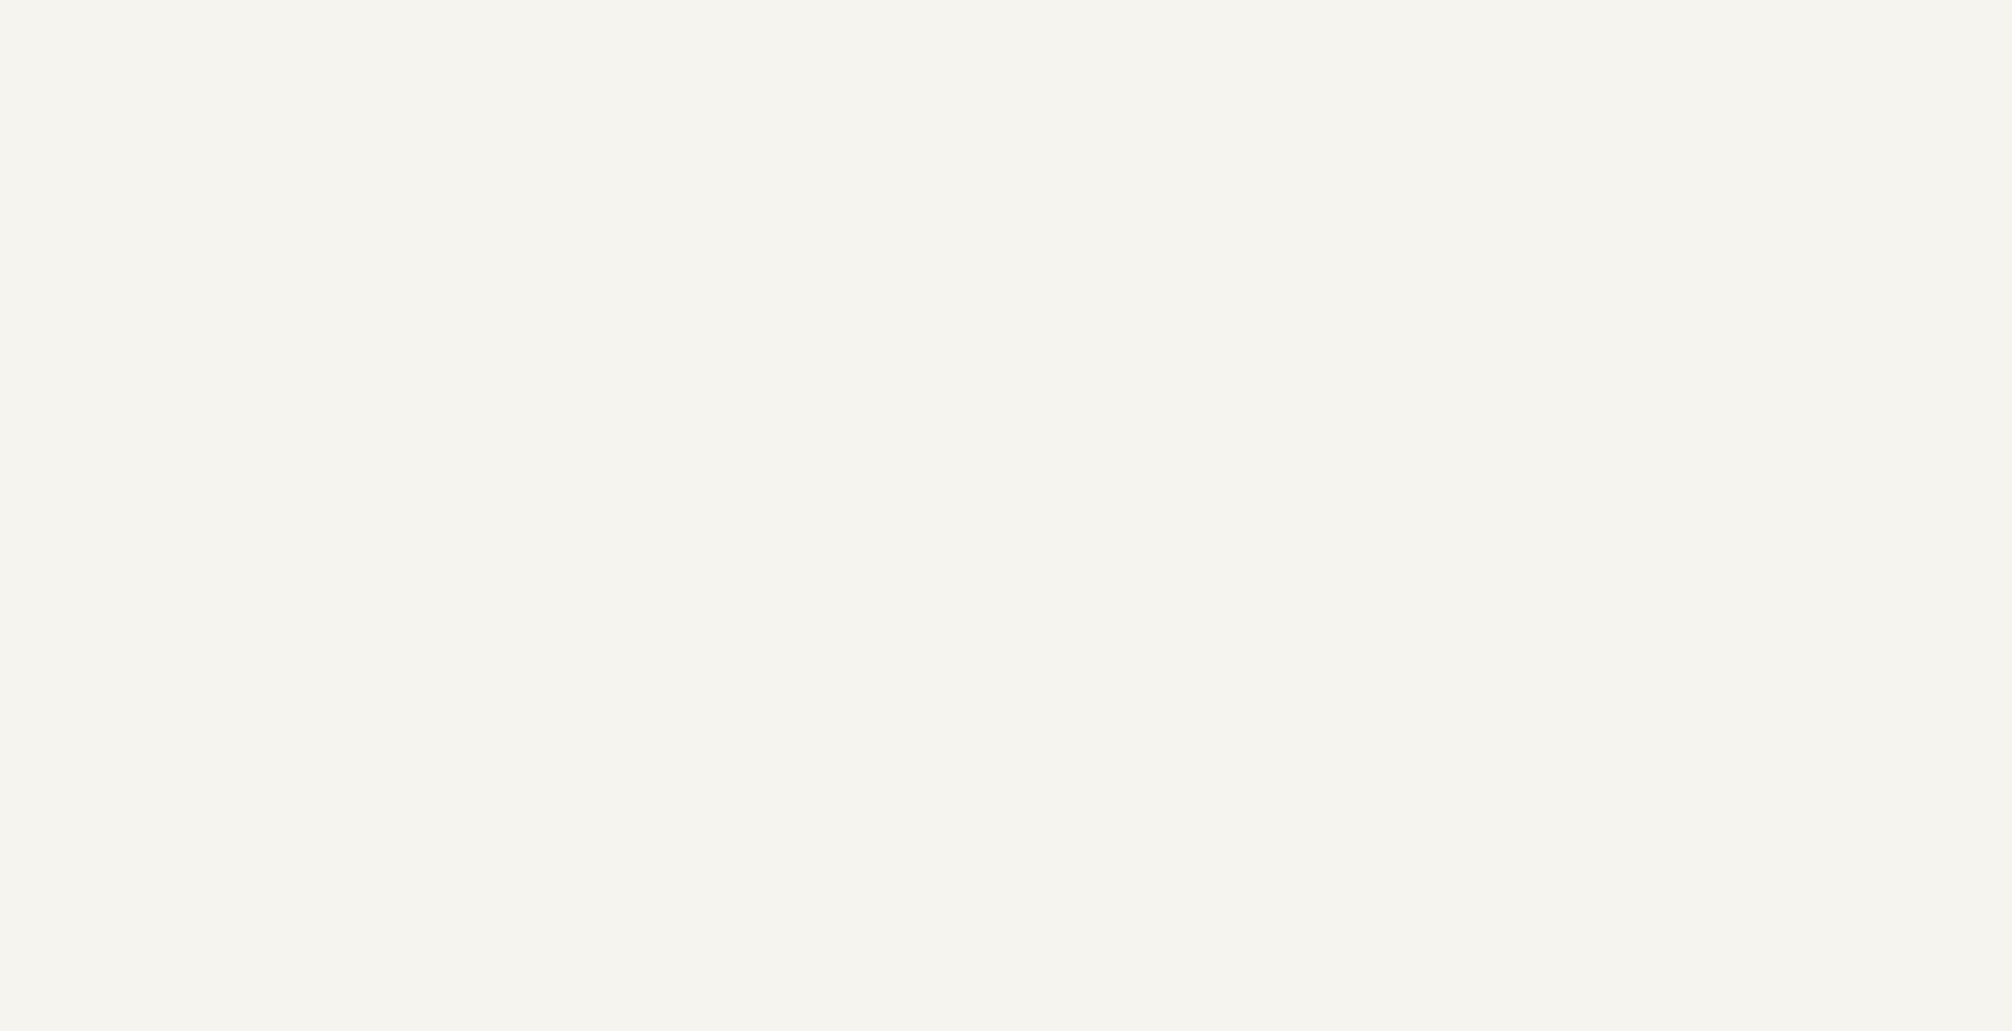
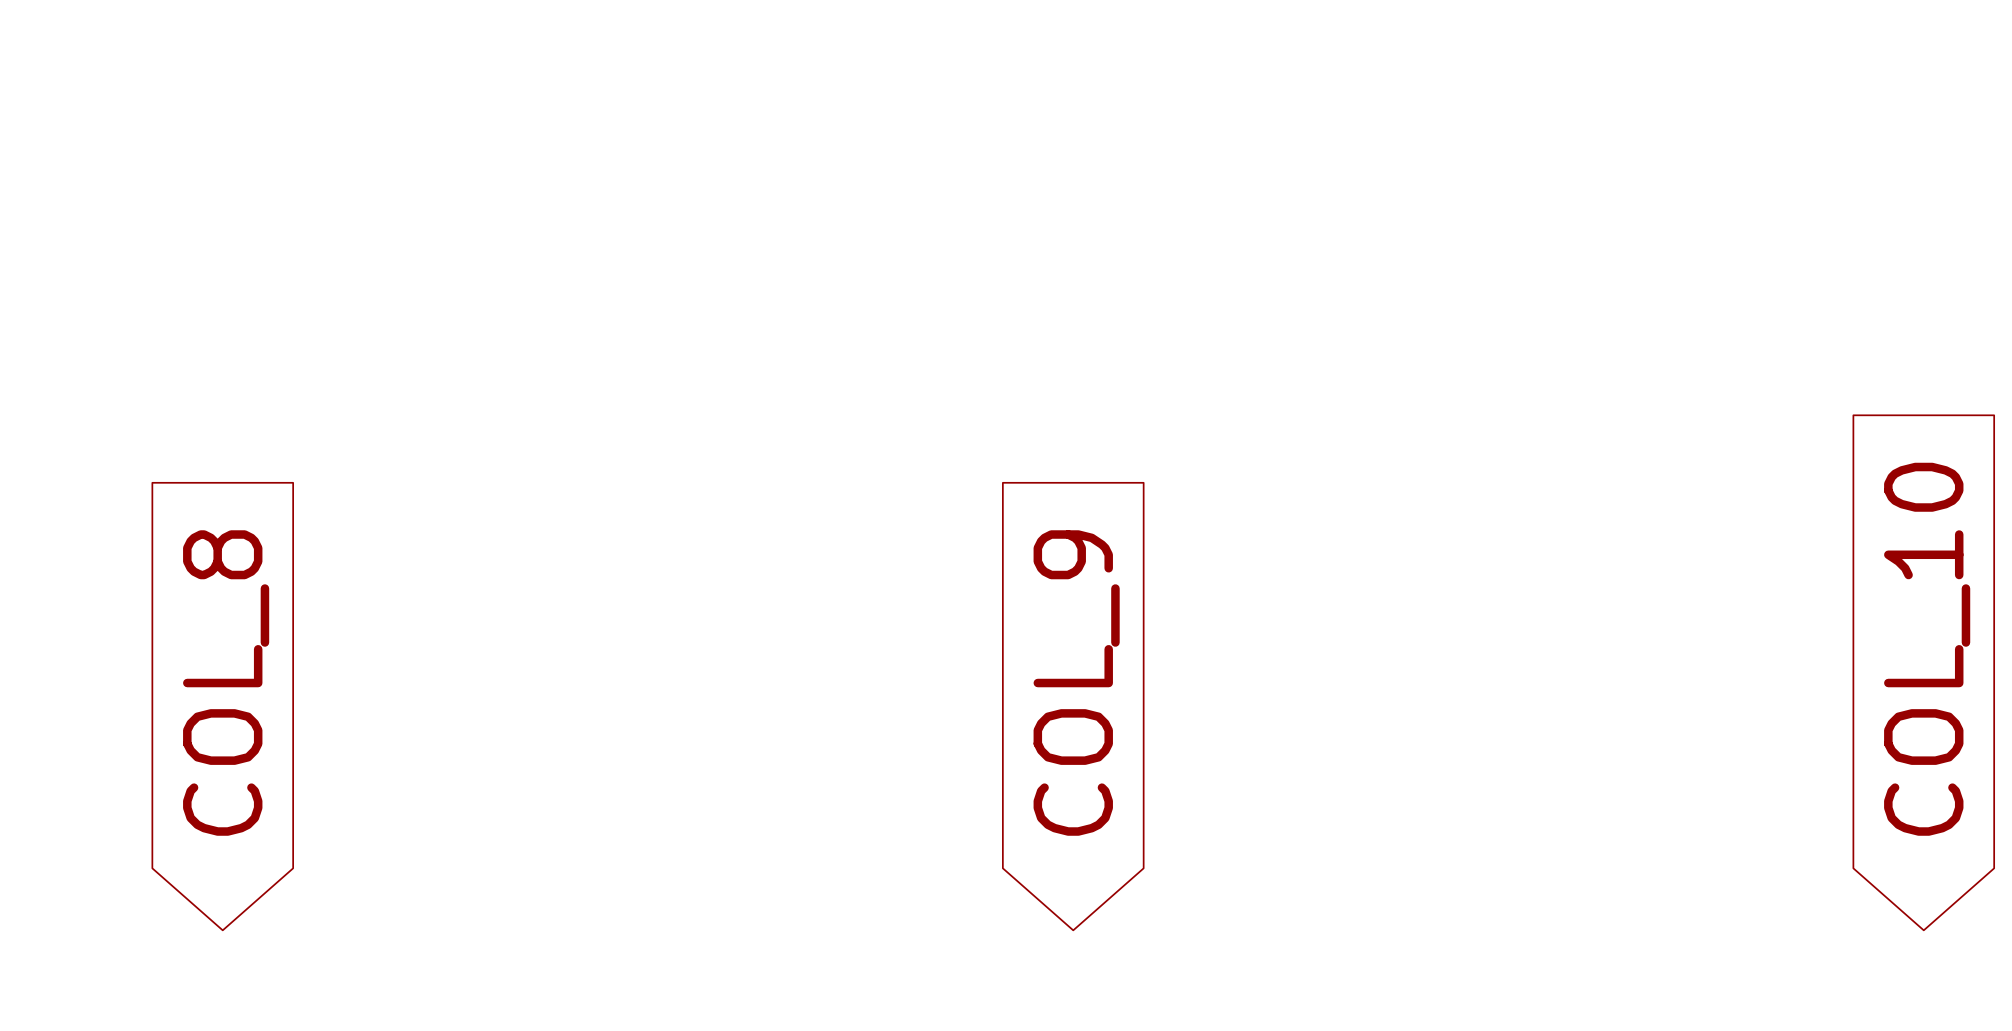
global label: none -> COL_10 (1927, 649)
global label: none -> COL_8 (226, 683)
global label: none -> COL_9 (1076, 683)

